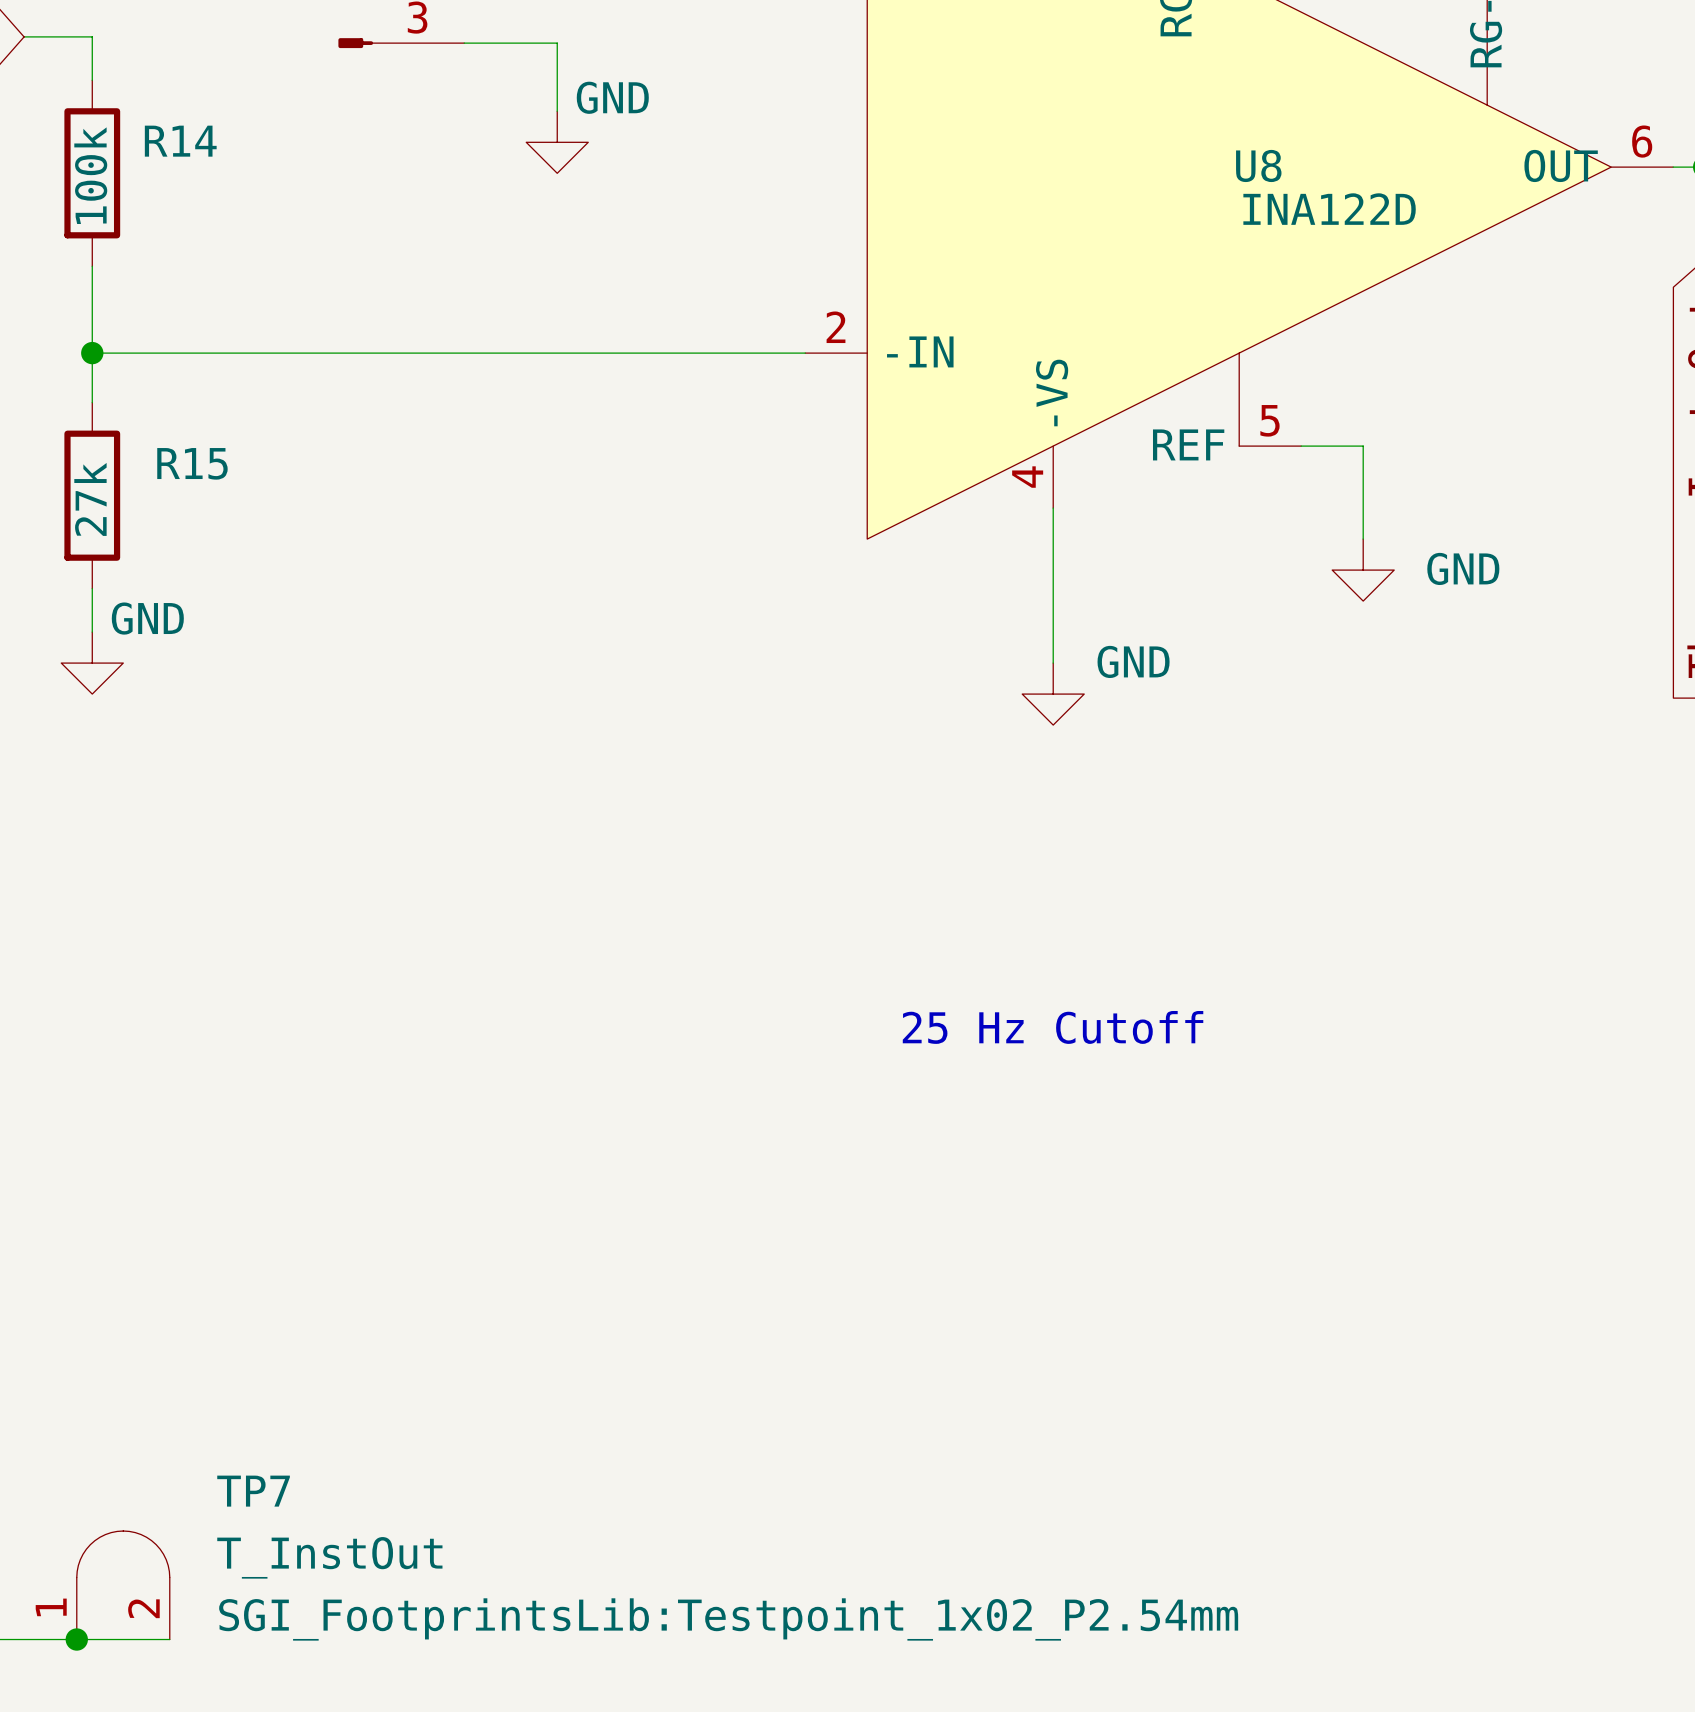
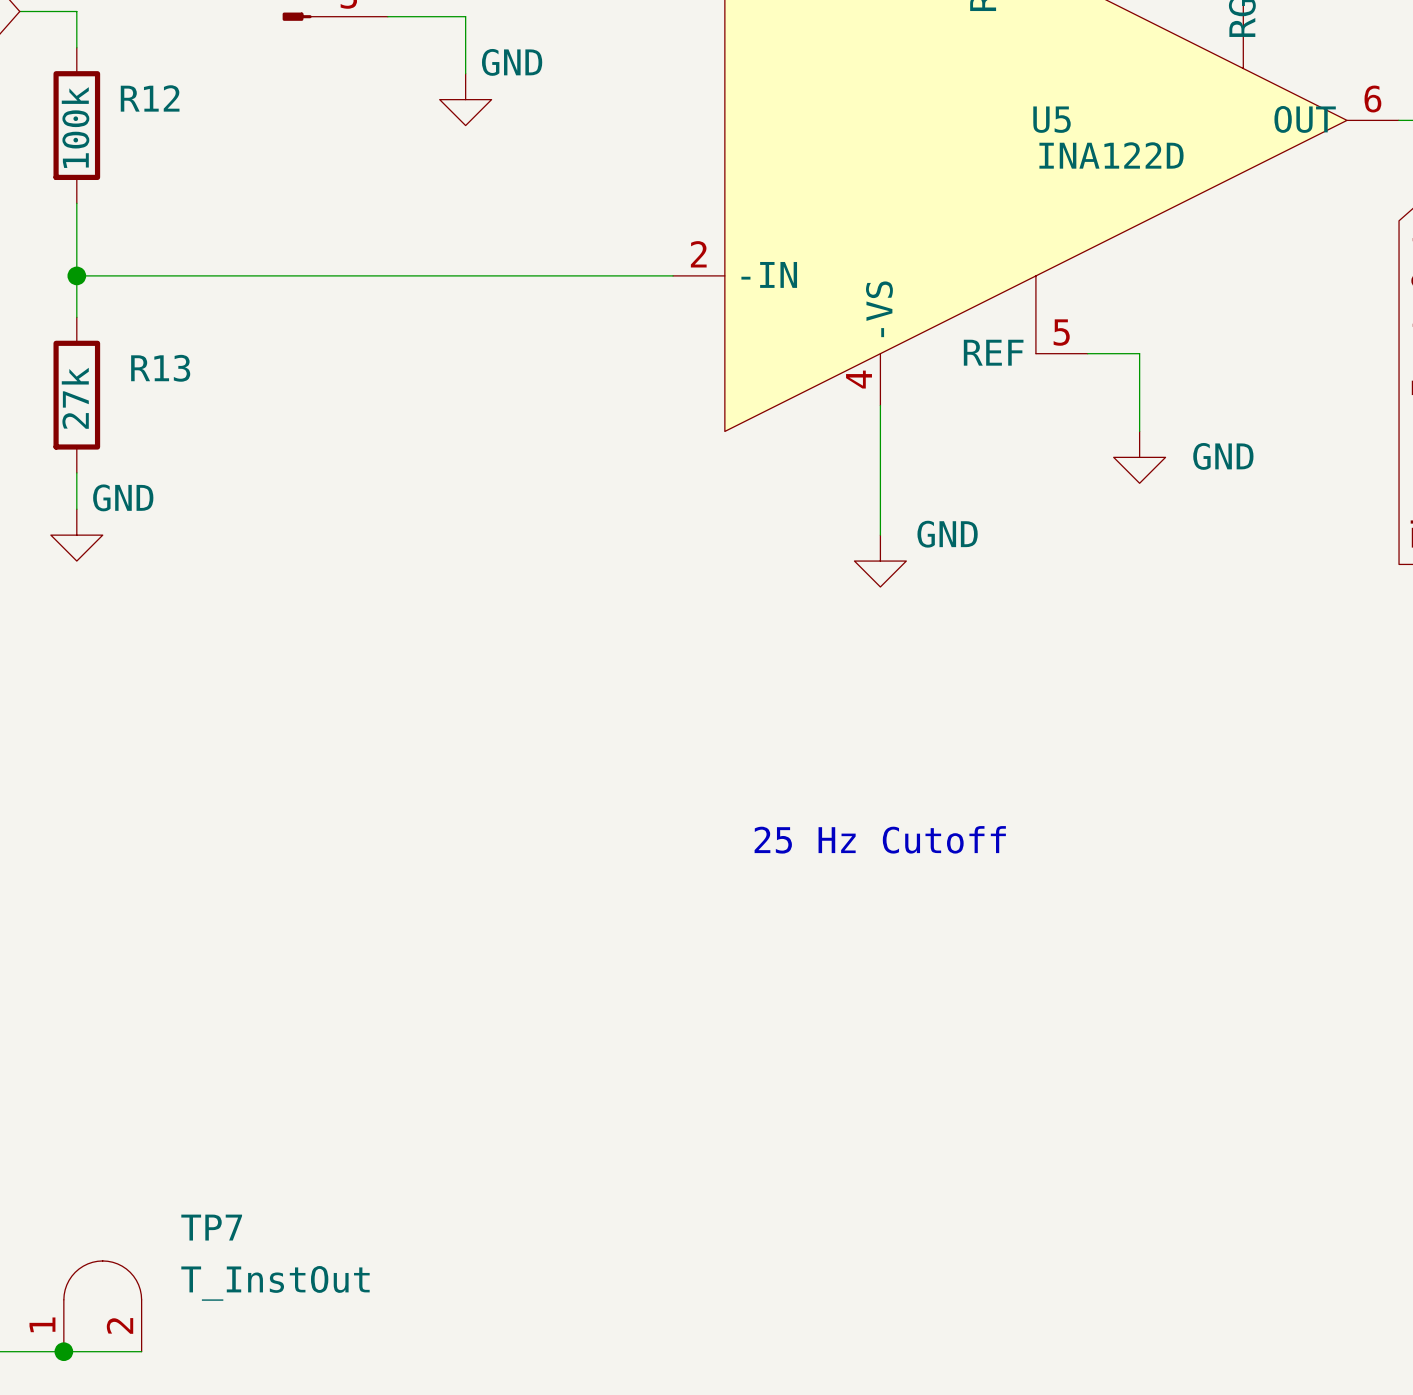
R14 name: R14 (180, 141) -> R12 (150, 98)
U8 name: U8 (1258, 165) -> U5 (1052, 119)
R15 name: R15 (192, 463) -> R13 (160, 368)
TP7 text: SGI_FootprintsLib:Testpoint_1x02_P2.54mm (728, 1619) -> none

